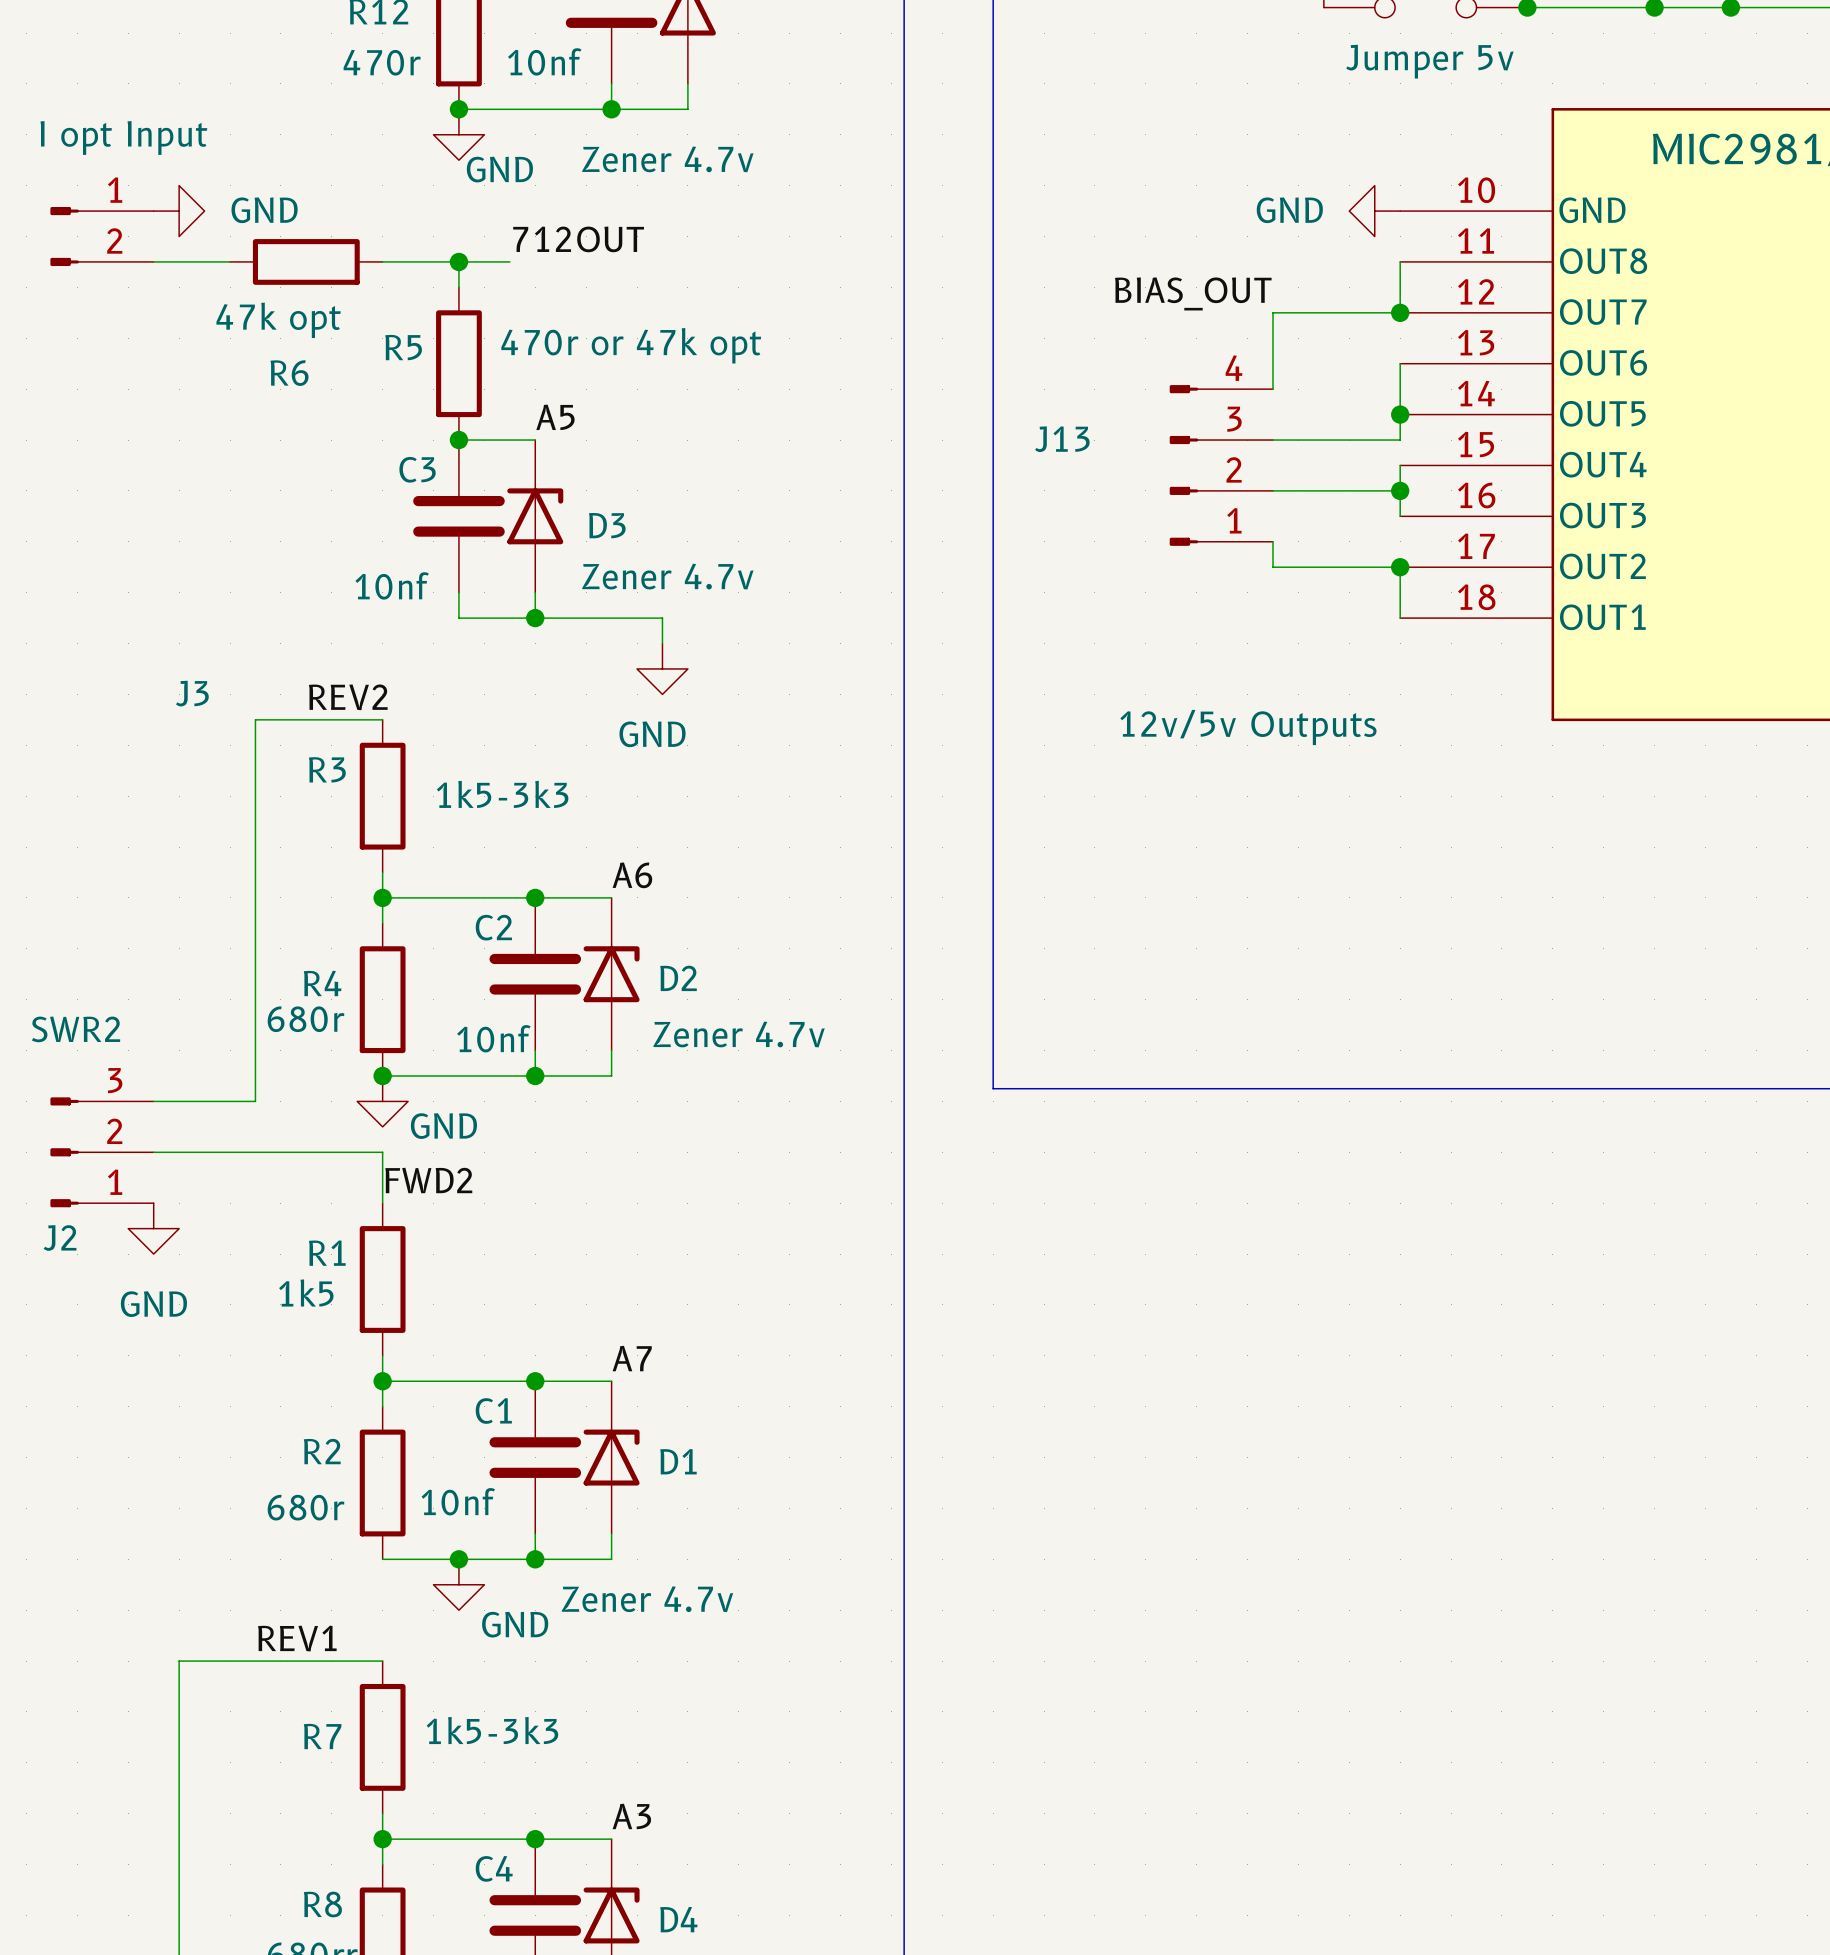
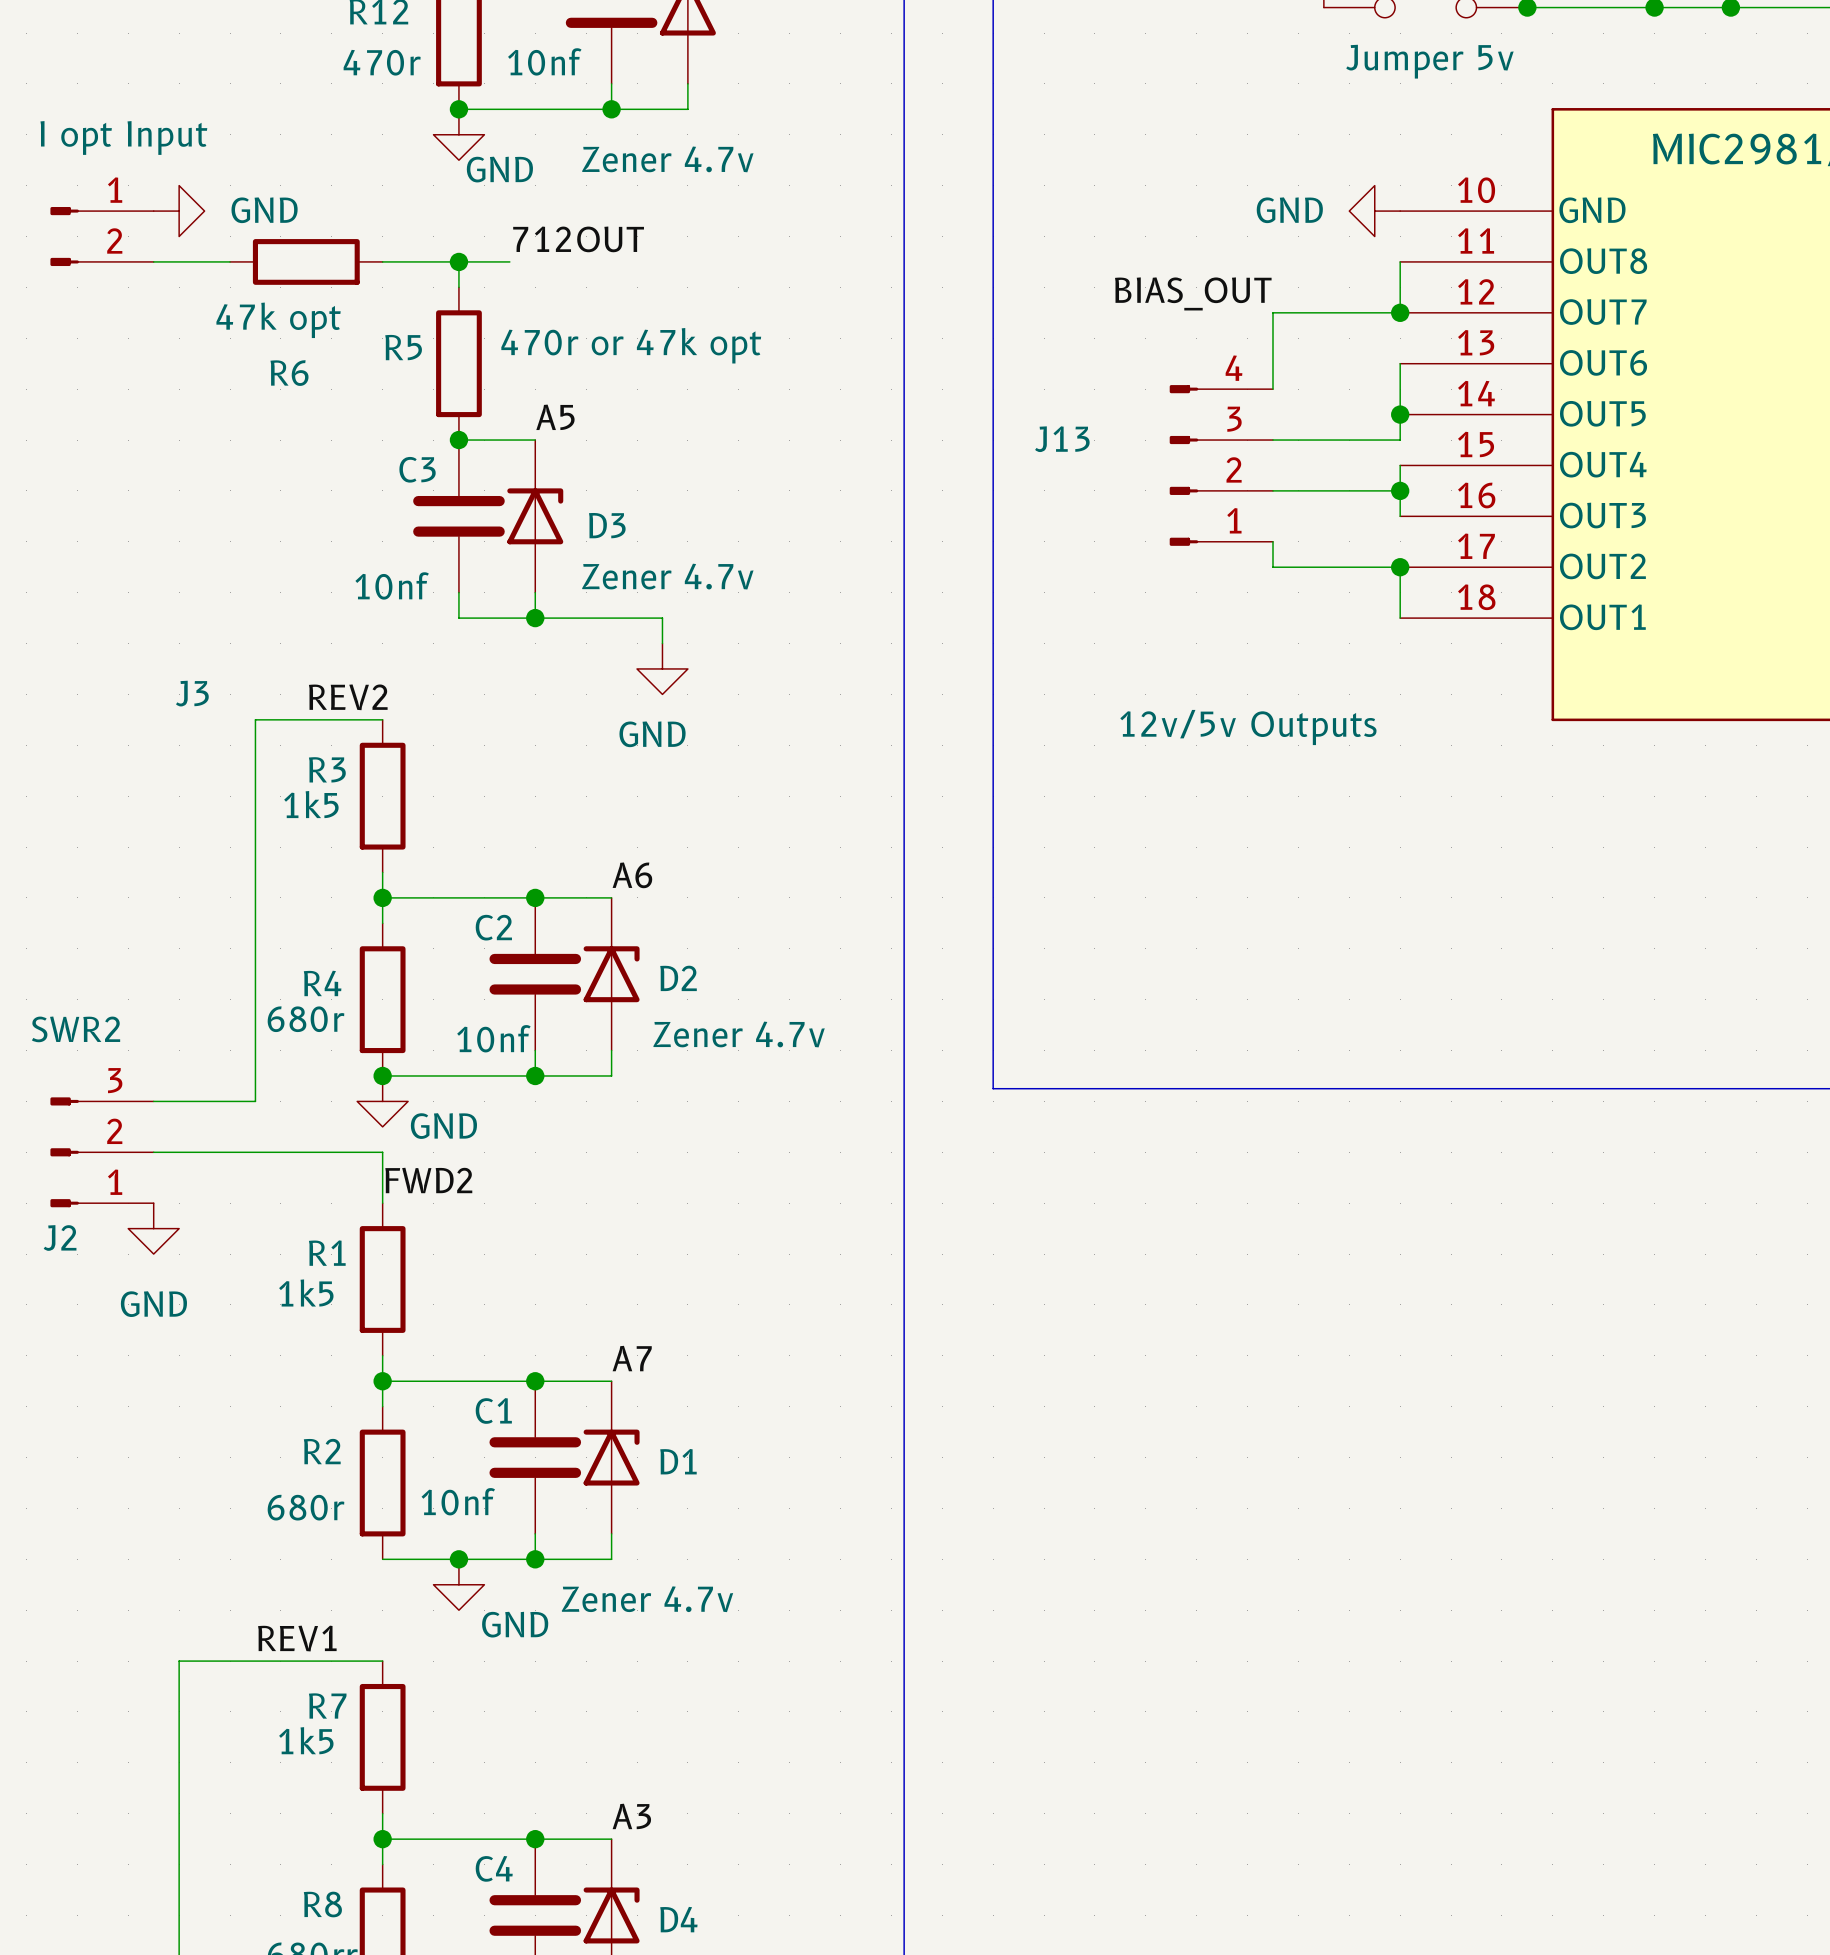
R3 value: 1k5-3k3 (502, 794) -> 1k5 (311, 804)
R7 value: 1k5-3k3 (492, 1730) -> 1k5 (306, 1740)
R7 name position: R7 (322, 1736) -> R7 (327, 1705)

